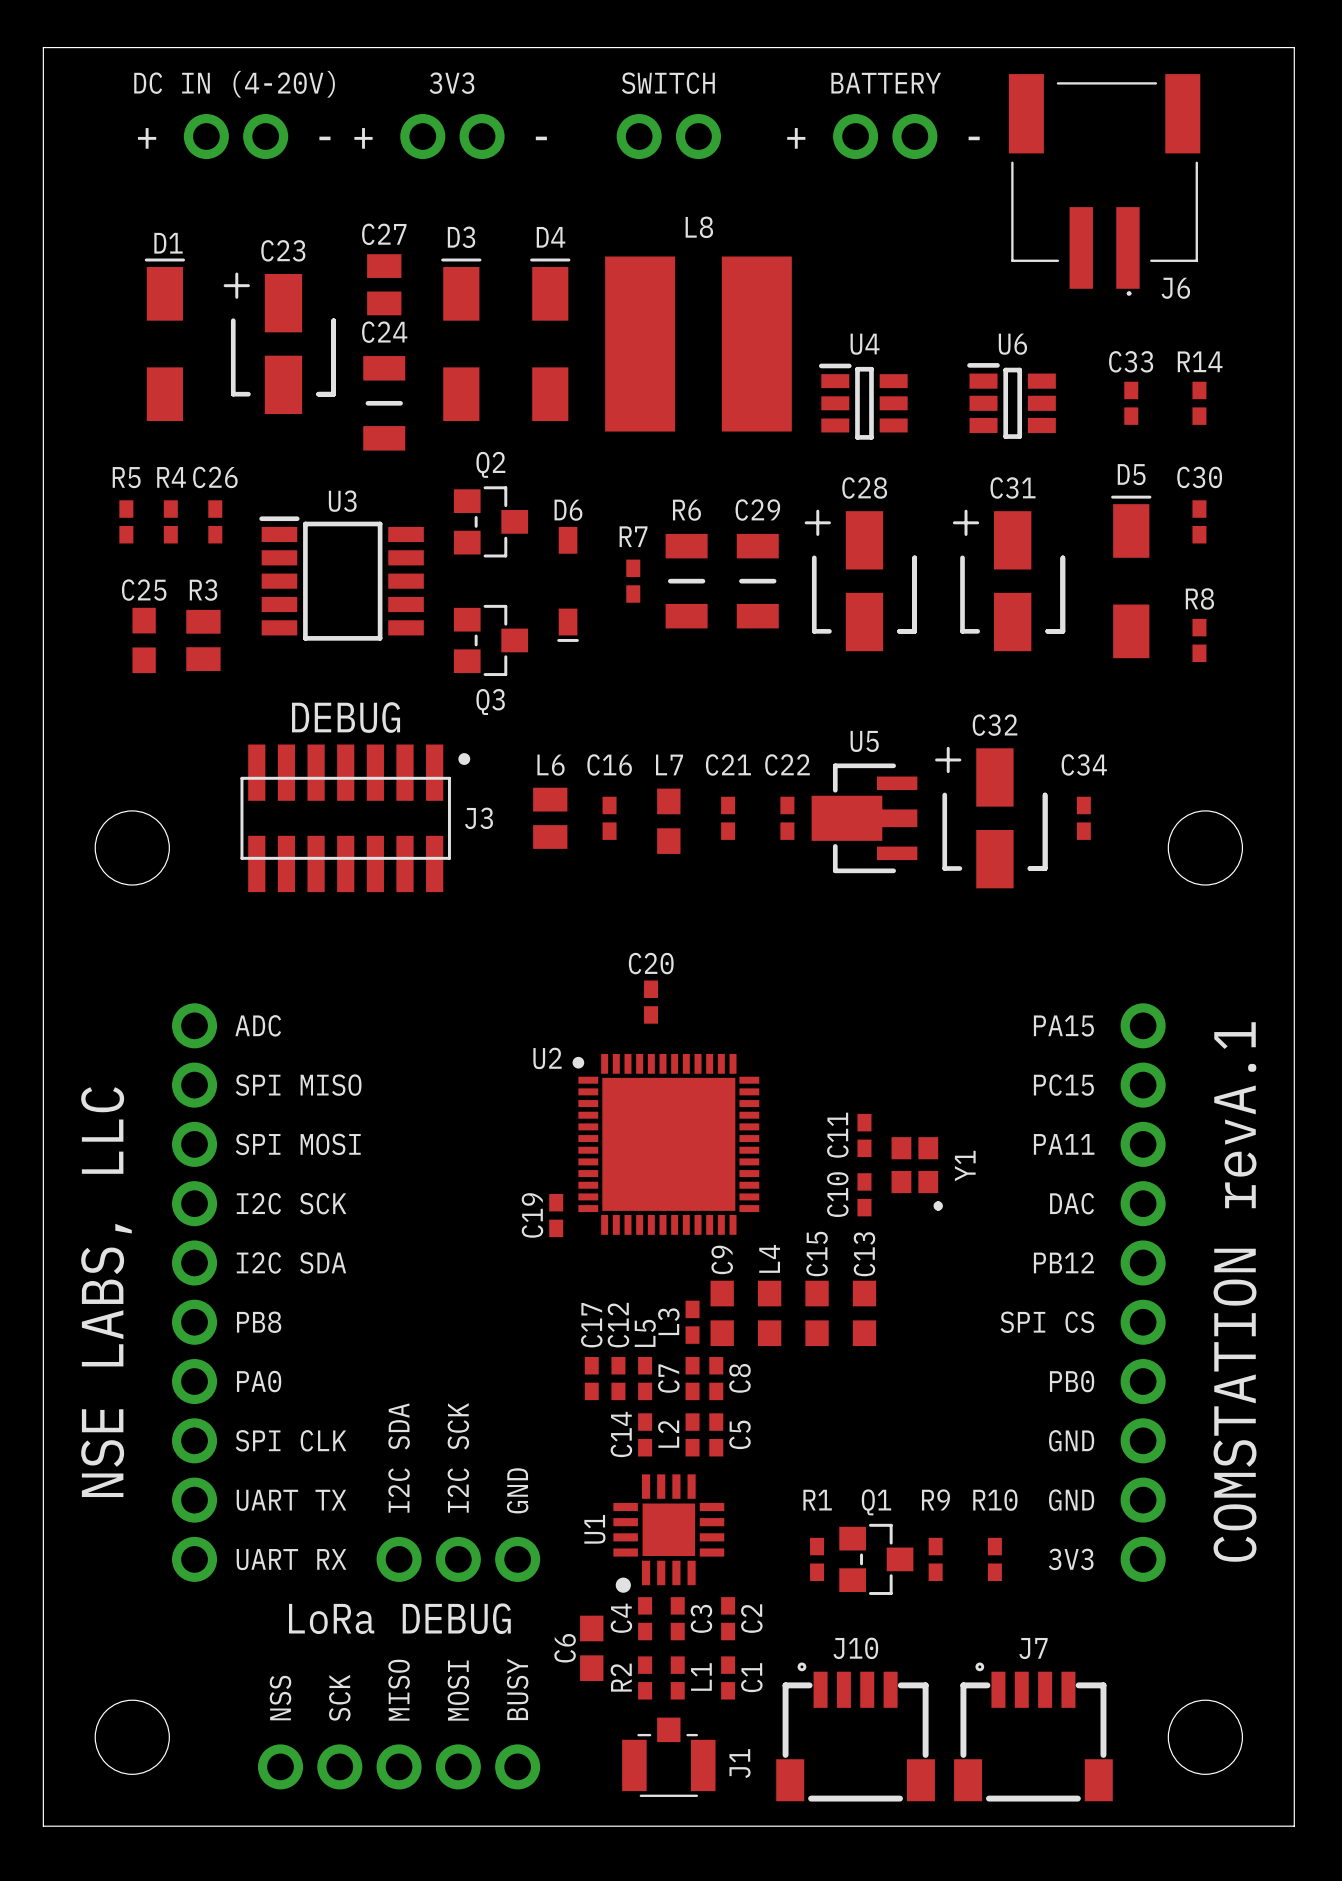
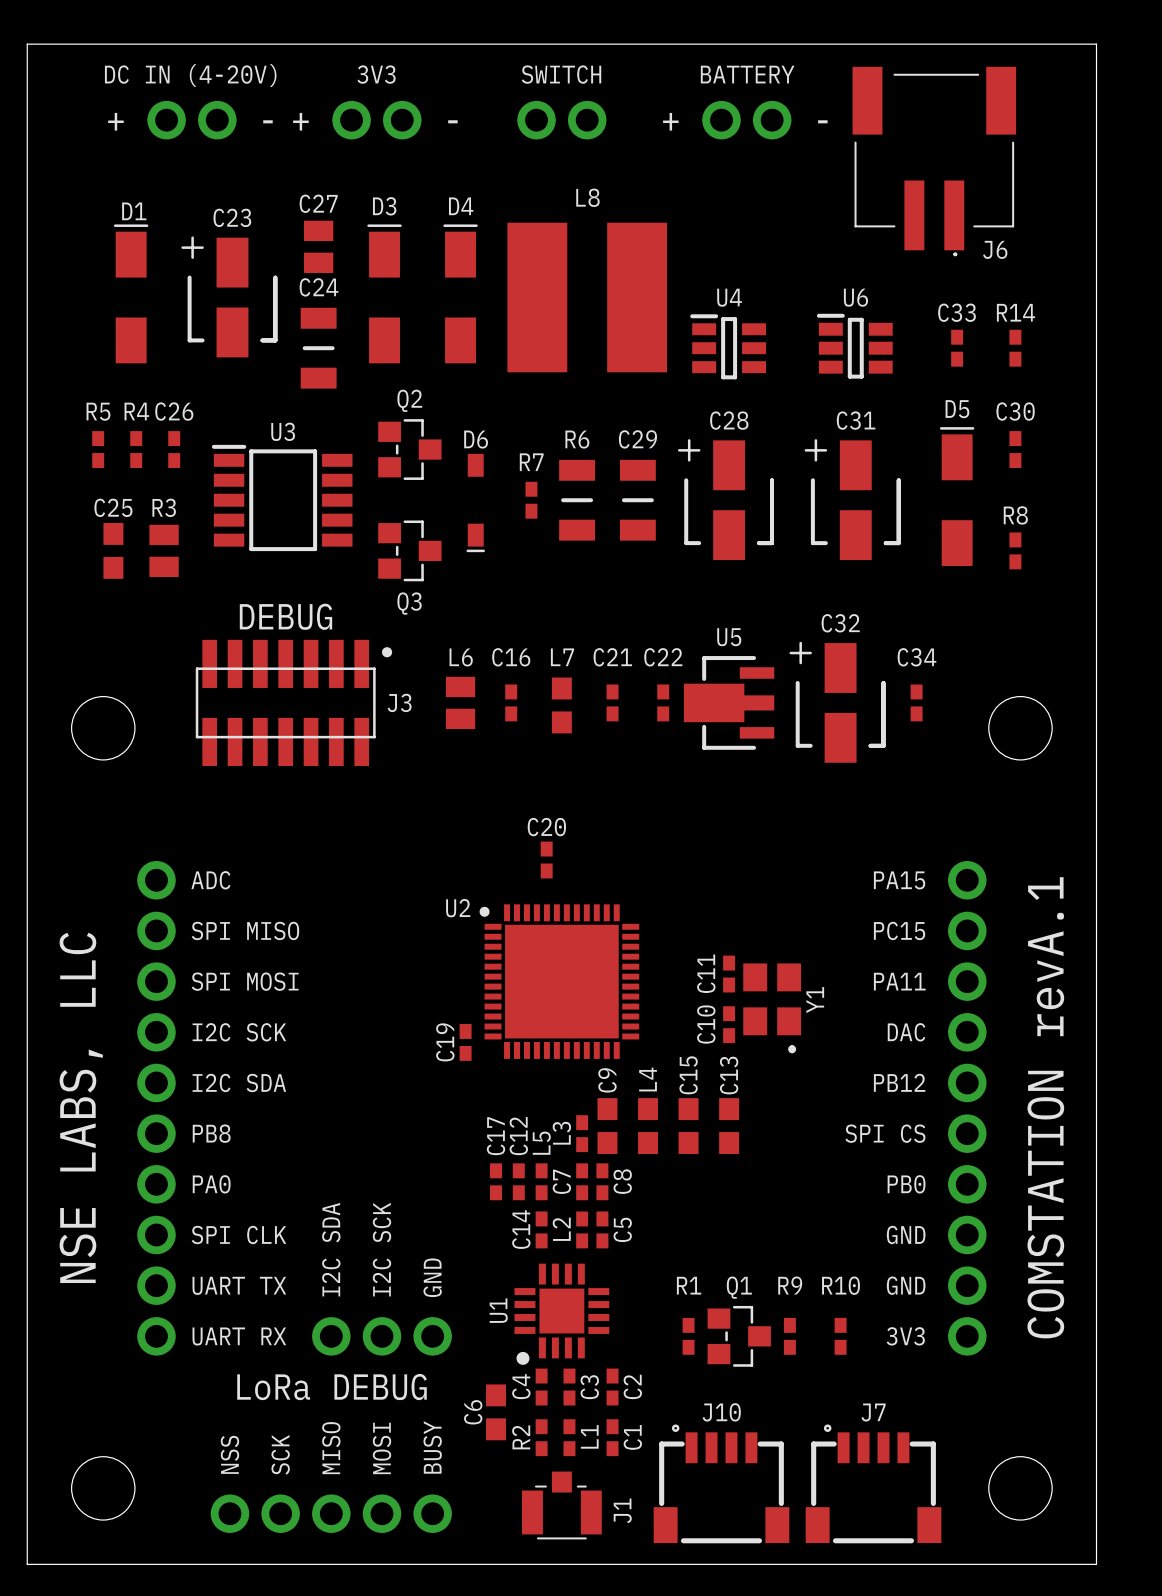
Y1 footprint: [891, 1137, 943, 1211] -> [743, 963, 802, 1054]

